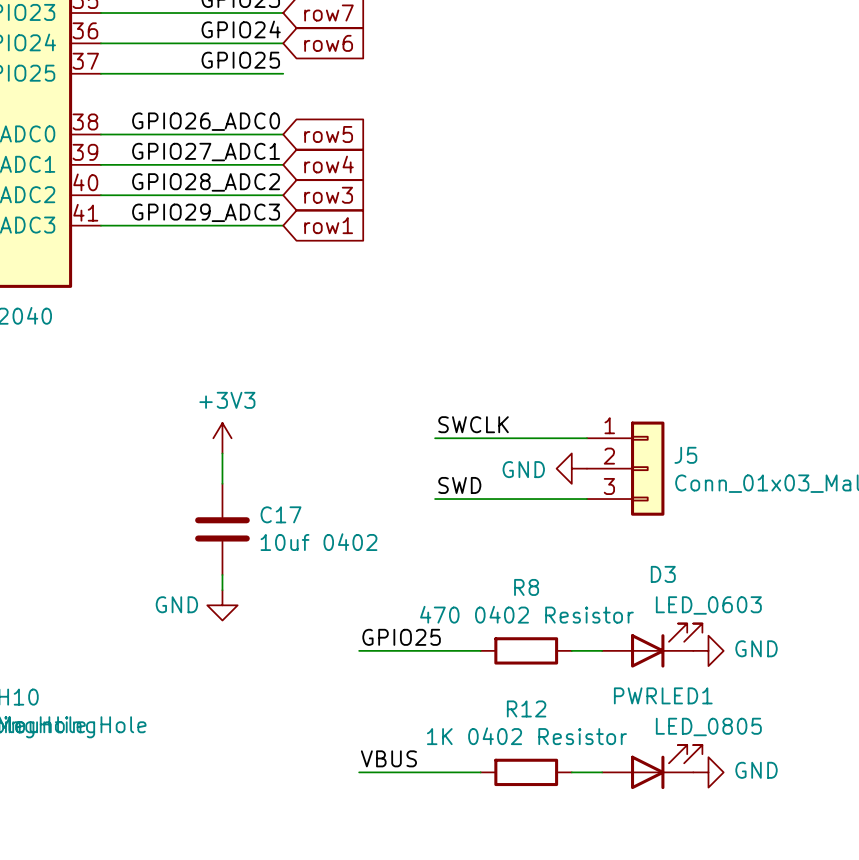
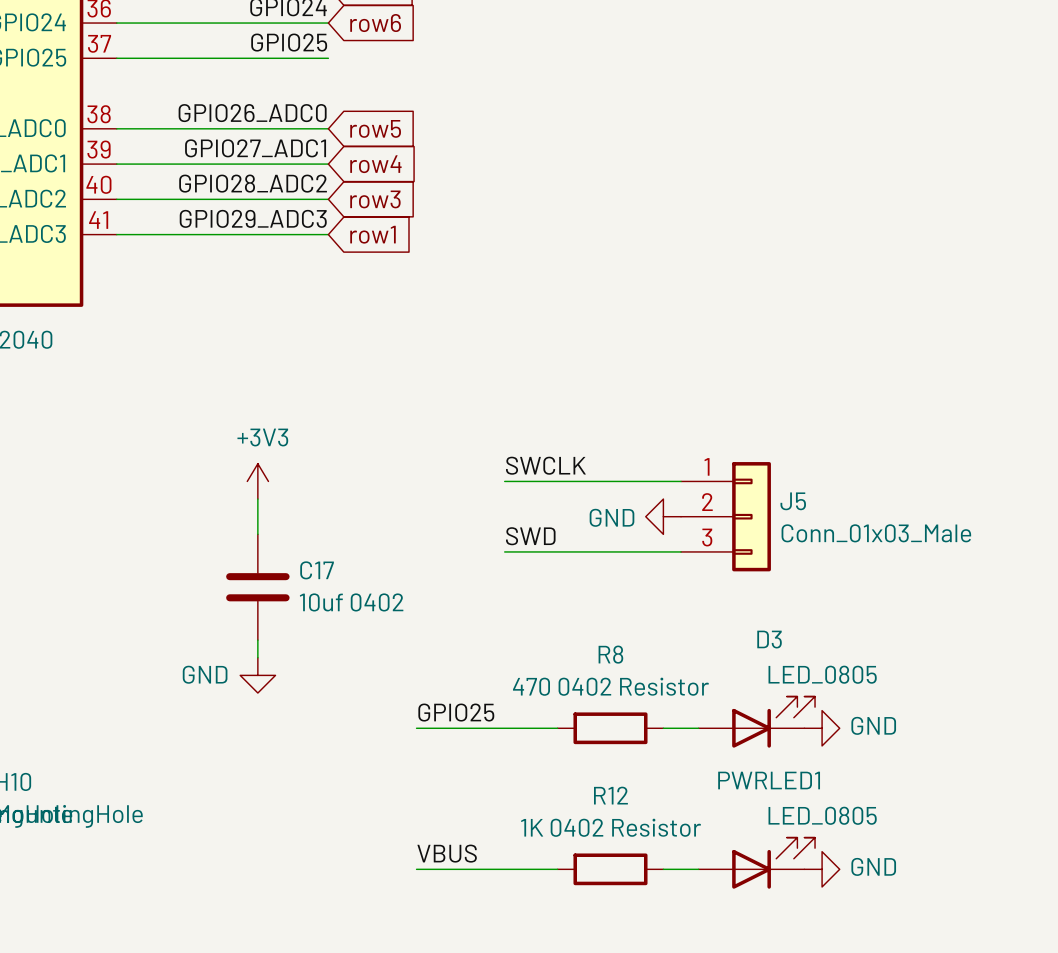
D3 value: LED_0603 (708, 605) -> LED_0805 (822, 674)

